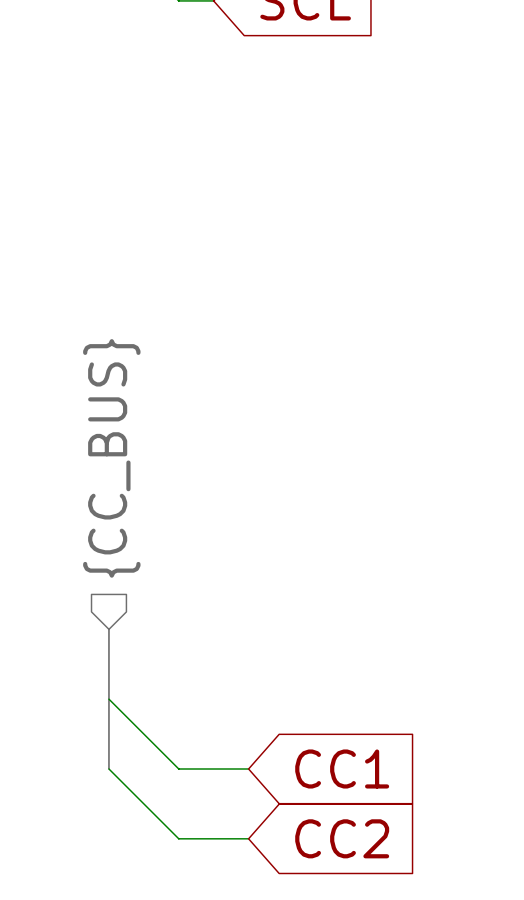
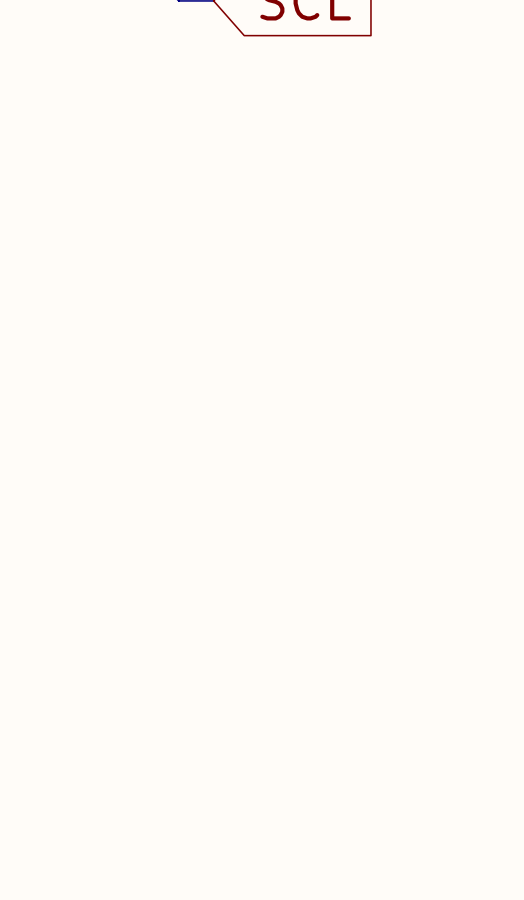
hierarchical label: {CC_BUS} (111, 458) -> none
bus: (108, 629) (108, 769) -> none
wire: (108, 699) (178, 769) (248, 769) -> none
wire: (108, 769) (178, 838) (248, 838) -> none
global label: CC1 (342, 769) -> none
global label: CC2 (342, 838) -> none

